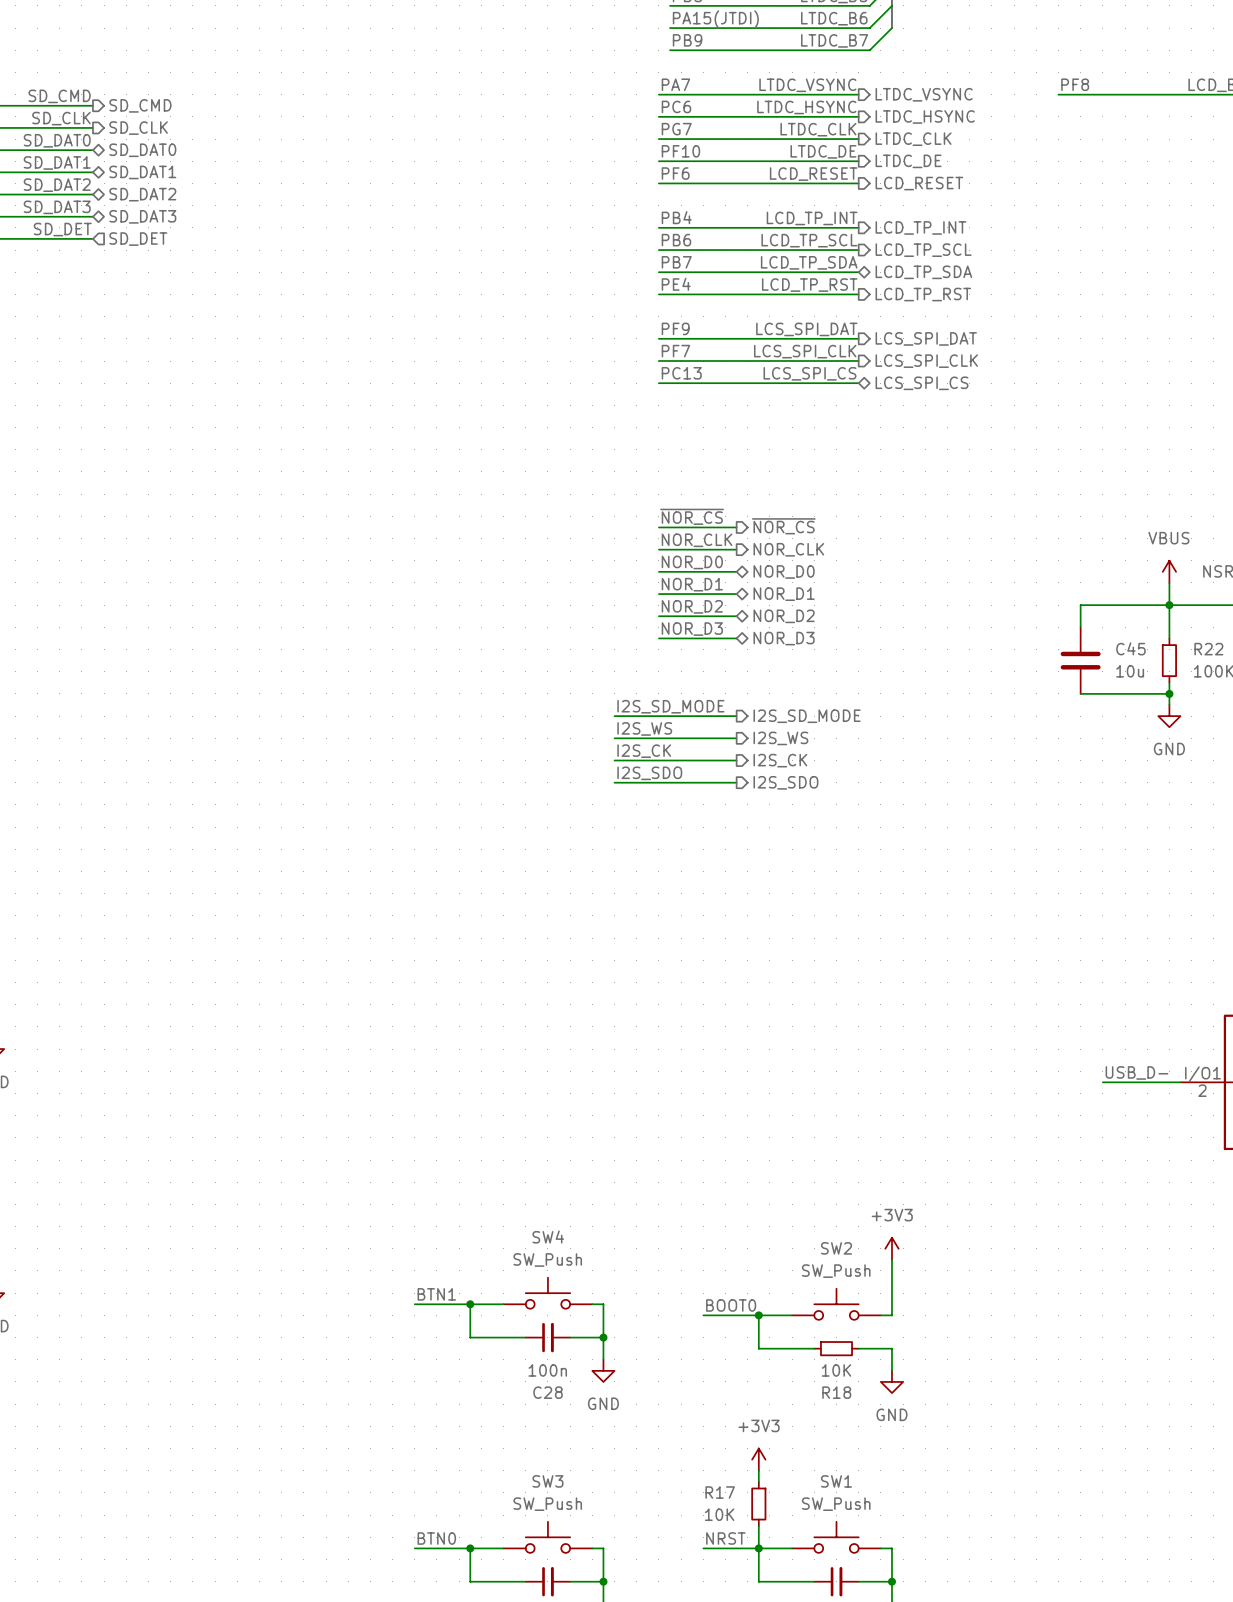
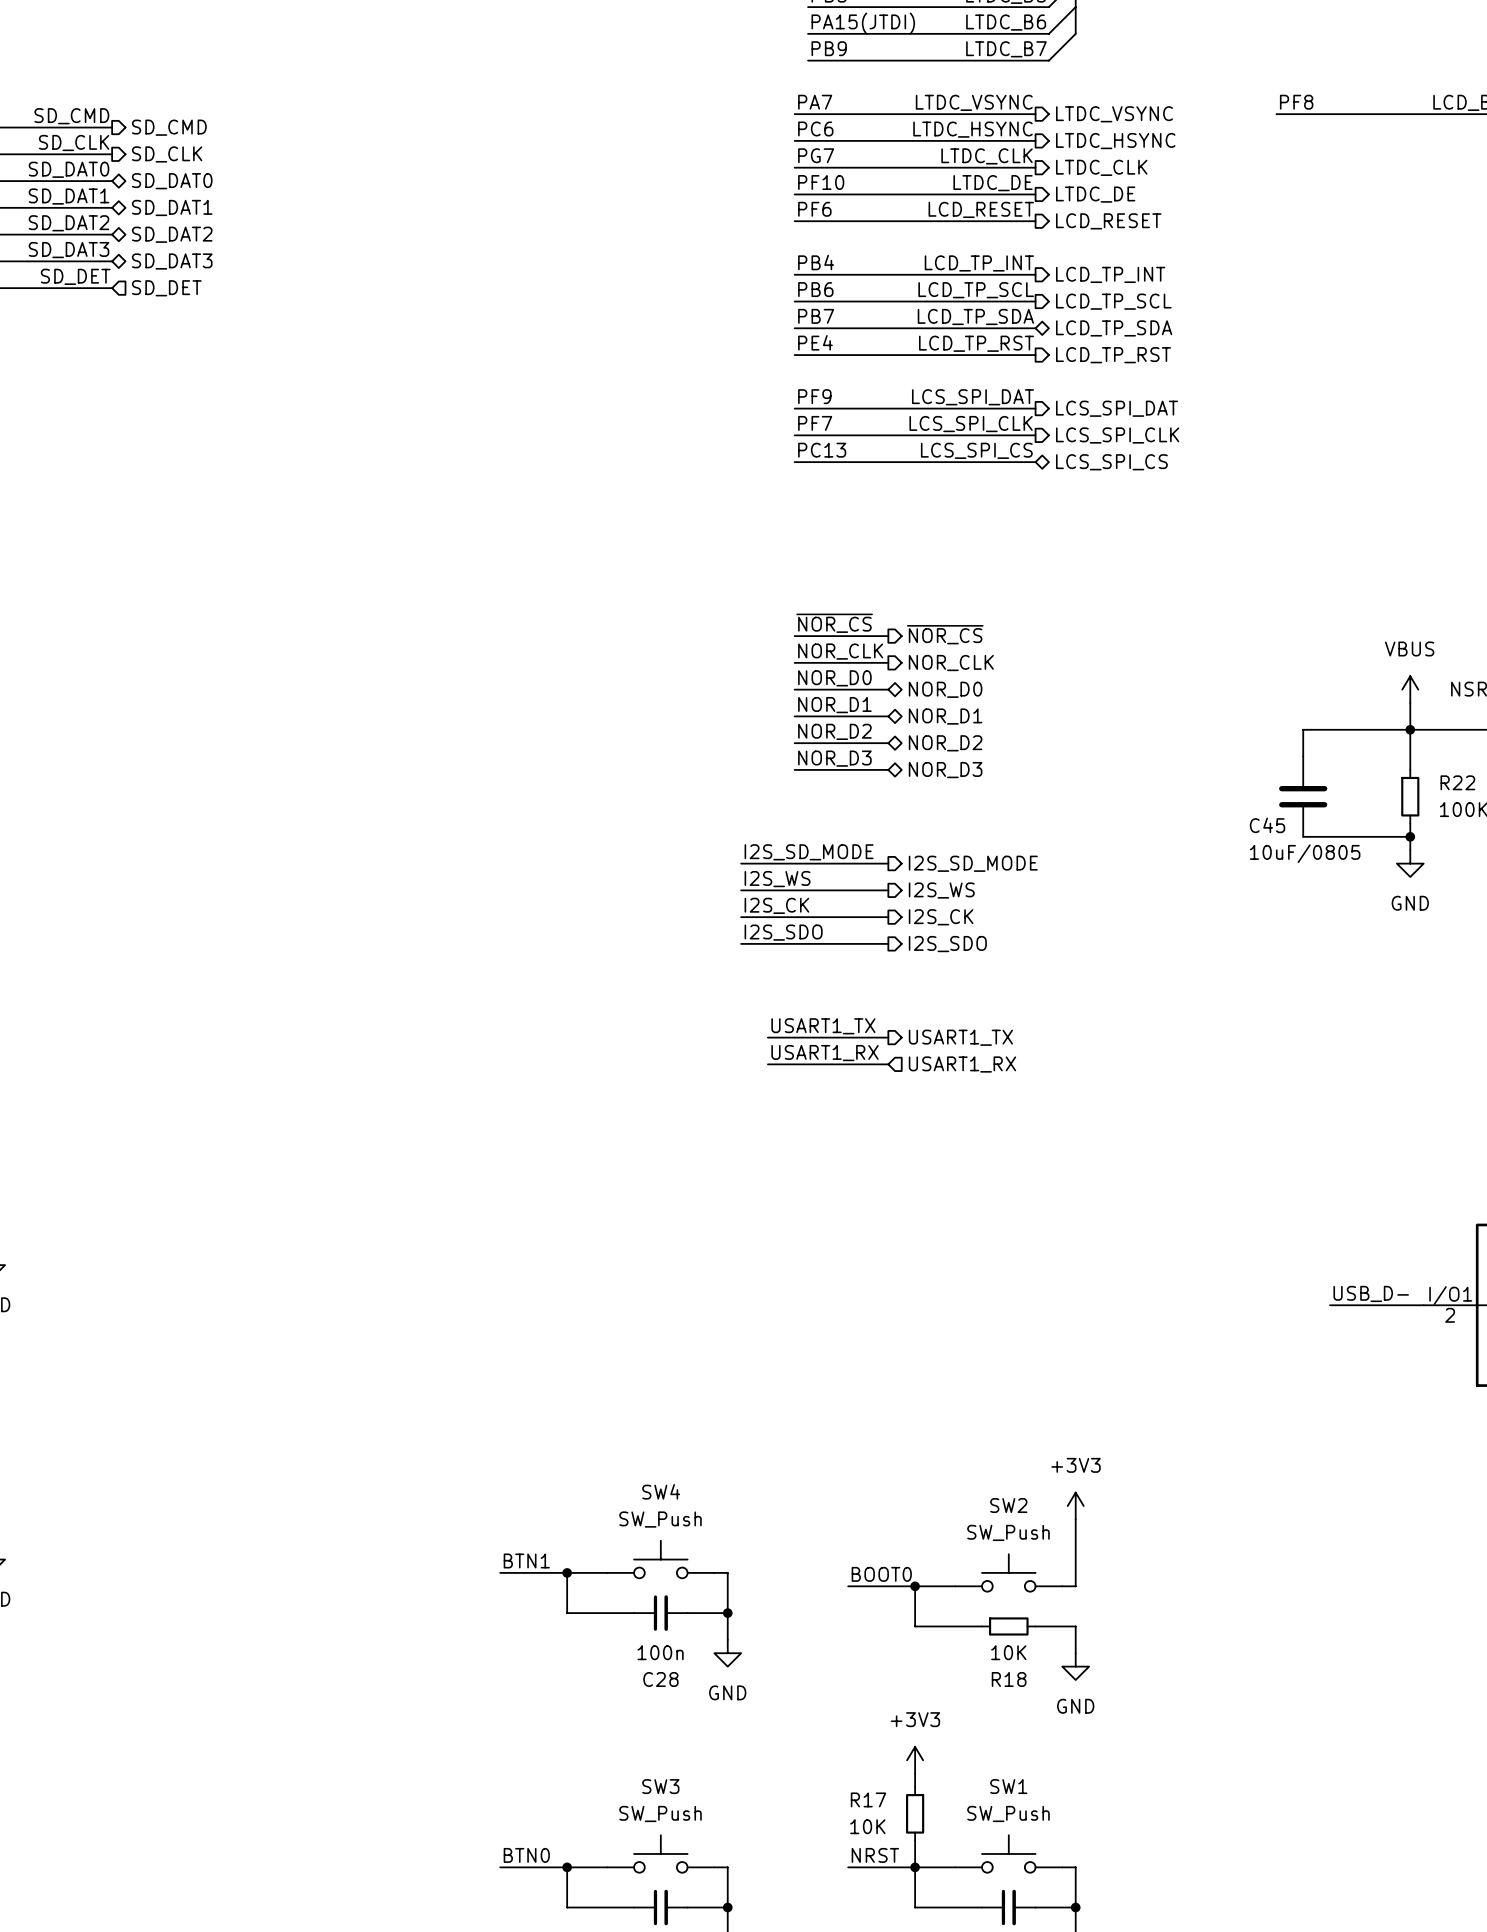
C45 name position: C45 (1130, 648) -> C45 (1267, 825)
C45 value: 10u (1130, 671) -> 10uF/0805 (1305, 853)
label: none -> USART1_TX (823, 1026)
wire: none -> (767, 1037) (888, 1037)
hierarchical label: none -> USART1_TX (960, 1037)
label: none -> USART1_RX (825, 1053)
wire: none -> (767, 1064) (888, 1064)
hierarchical label: none -> USART1_RX (962, 1064)

